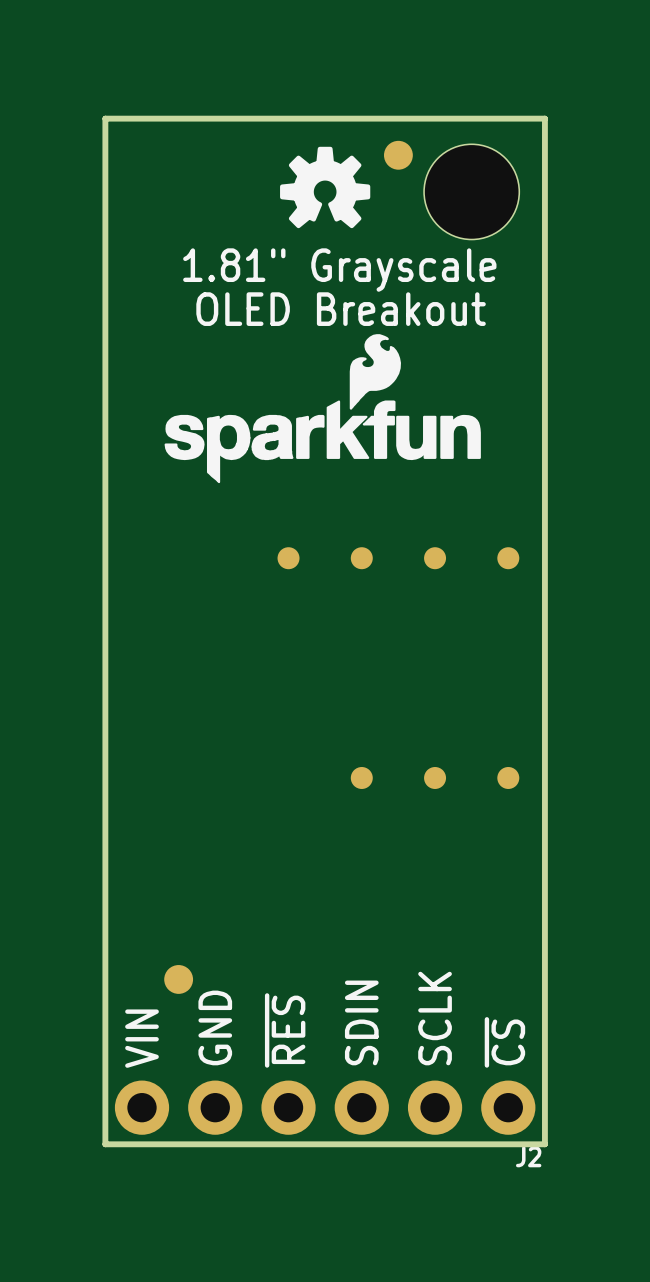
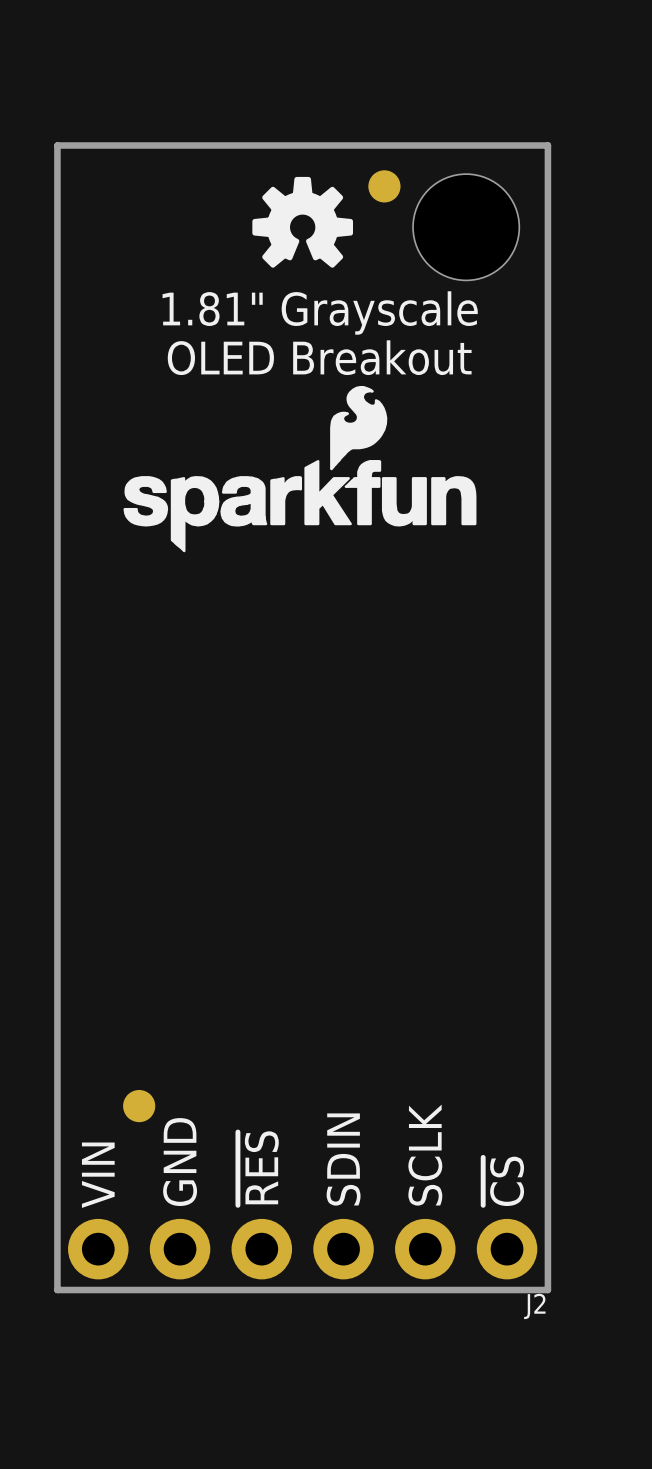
part: (288, 558) -> none
part: (361, 558) -> none
part: (435, 558) -> none
part: (508, 558) -> none
part: (361, 777) -> none
part: (435, 777) -> none
part: (508, 777) -> none

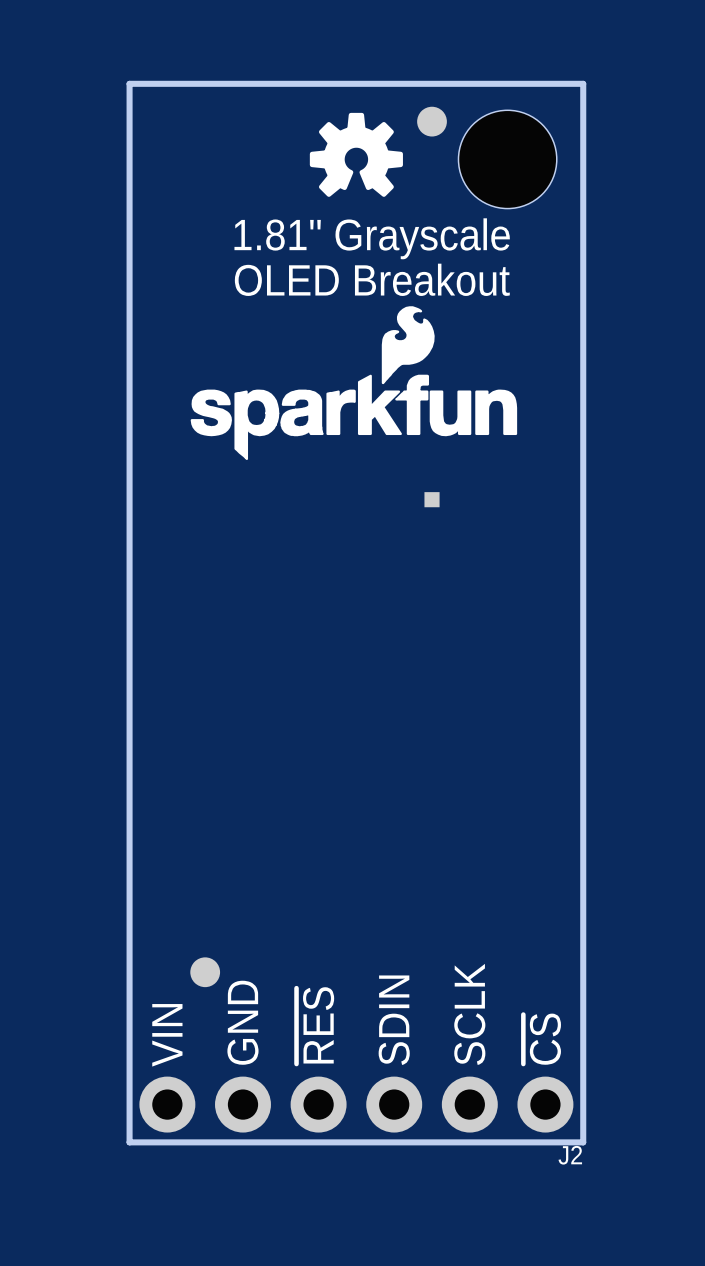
part: none -> (432, 499)

